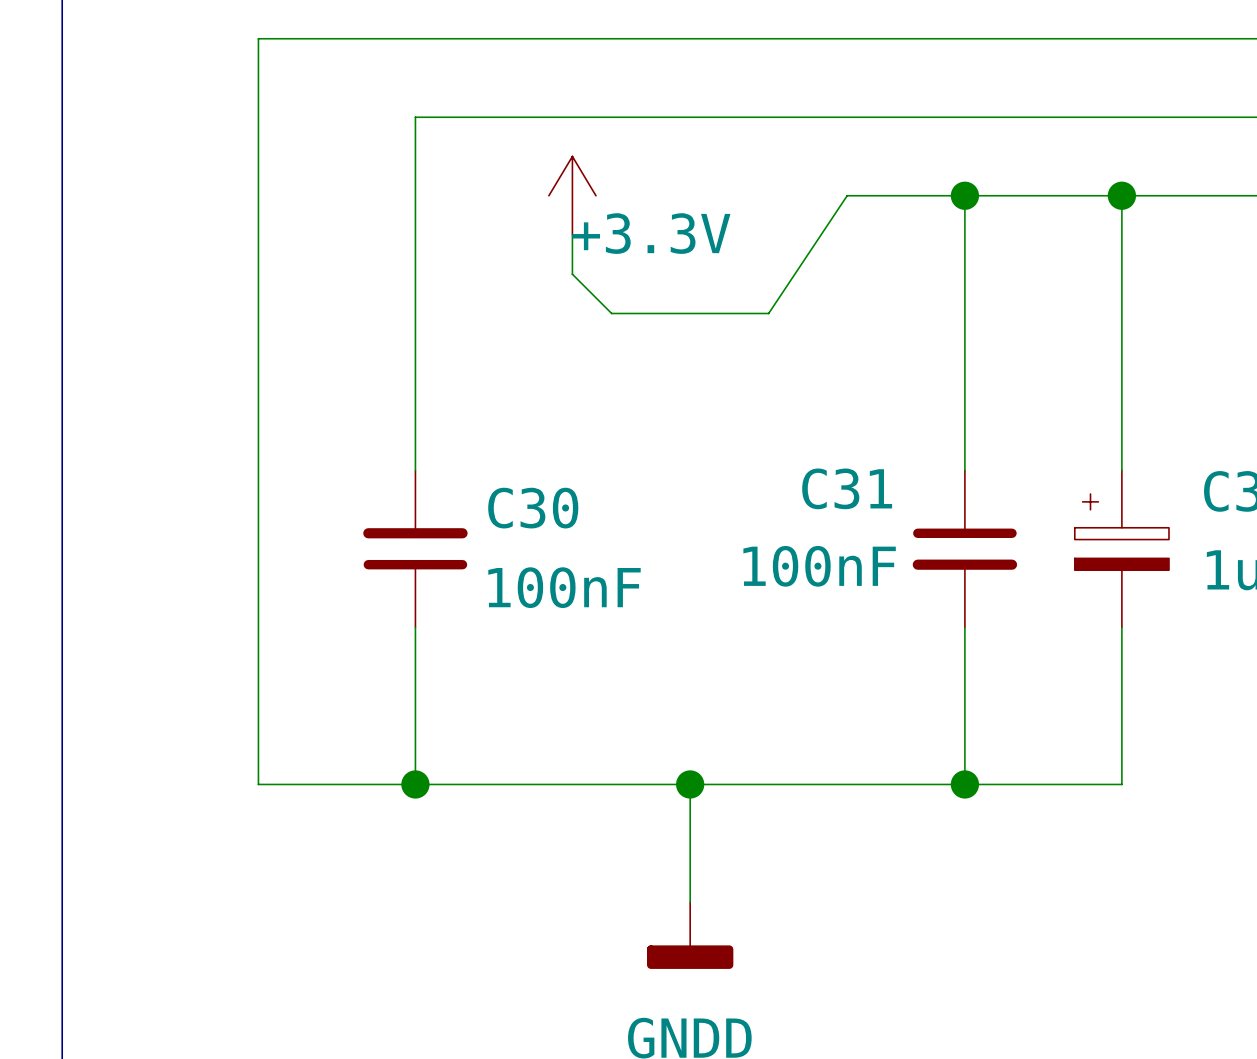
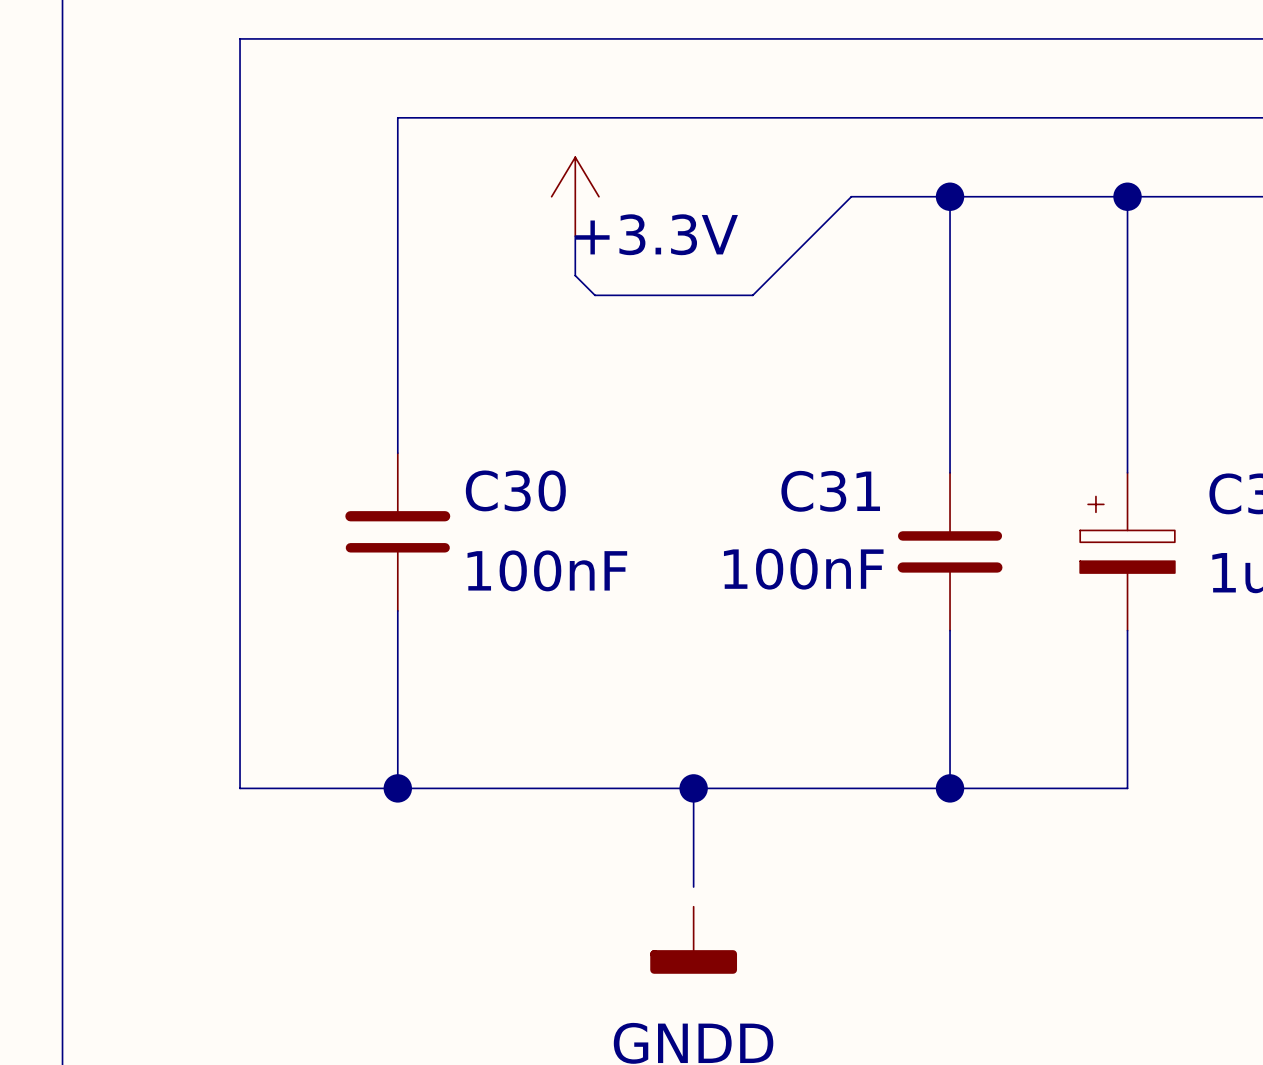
wire: (258, 38) (258, 784) -> (259, 38) (240, 38) (240, 788) (259, 788)
wire: (415, 117) (415, 470) -> (417, 117) (397, 117) (397, 453)
wire: (847, 195) (768, 313) (611, 313) (592, 293) -> (851, 196) (752, 295) (595, 295)
wire: (964, 195) (964, 470) -> (950, 196) (950, 472)
junction position: (964, 195) -> (950, 196)
C30 position: (415, 548) -> (397, 532)
C31 position: (964, 548) -> (950, 551)
wire: none -> (397, 610) (397, 788)
wire: (415, 627) (415, 784) -> none
wire: (964, 627) (964, 784) -> (950, 630) (950, 788)
junction position: (415, 784) -> (397, 788)
junction position: (964, 784) -> (950, 788)
wire: (690, 882) (690, 902) -> none

